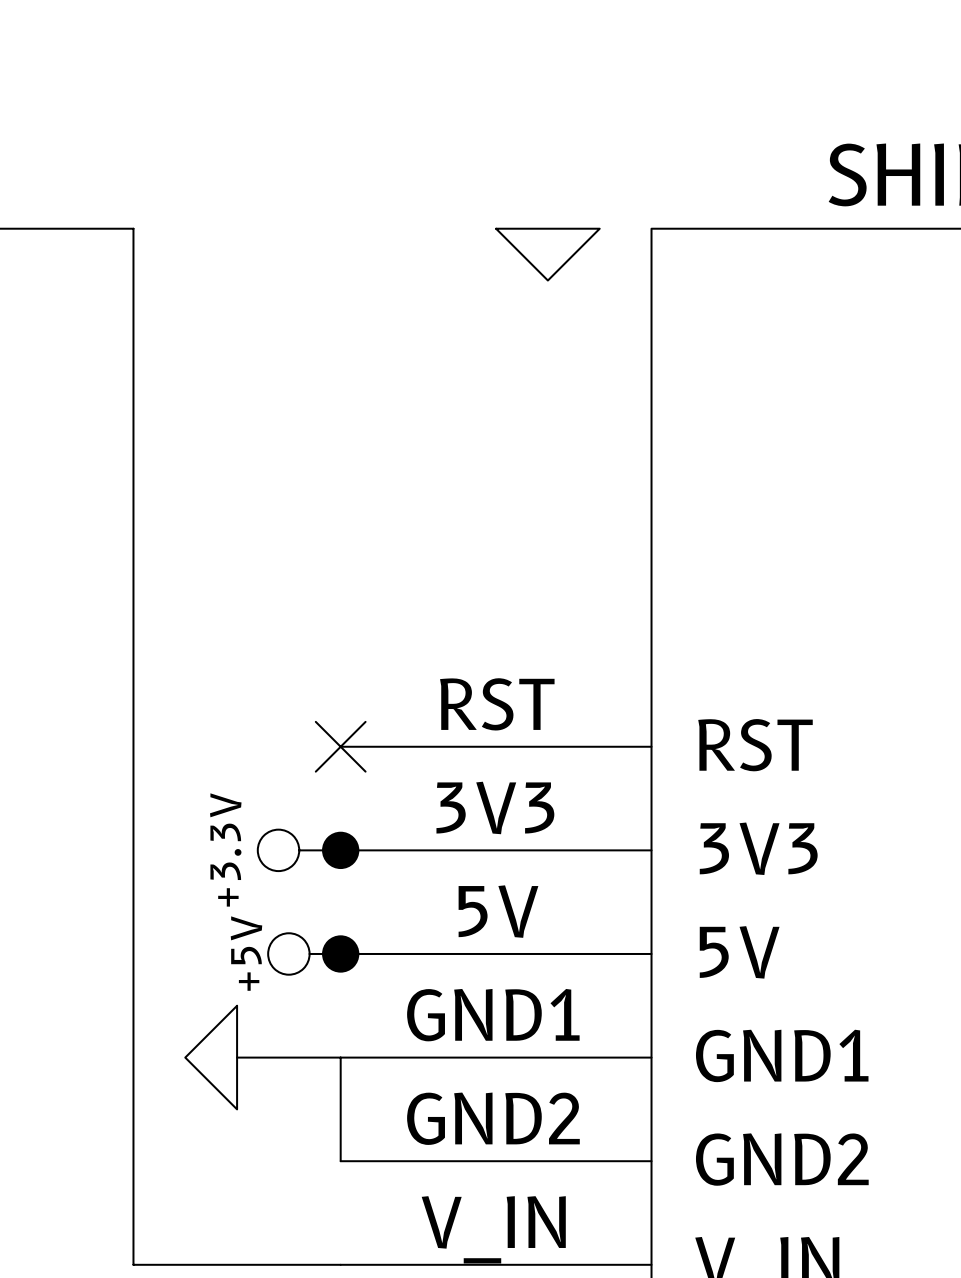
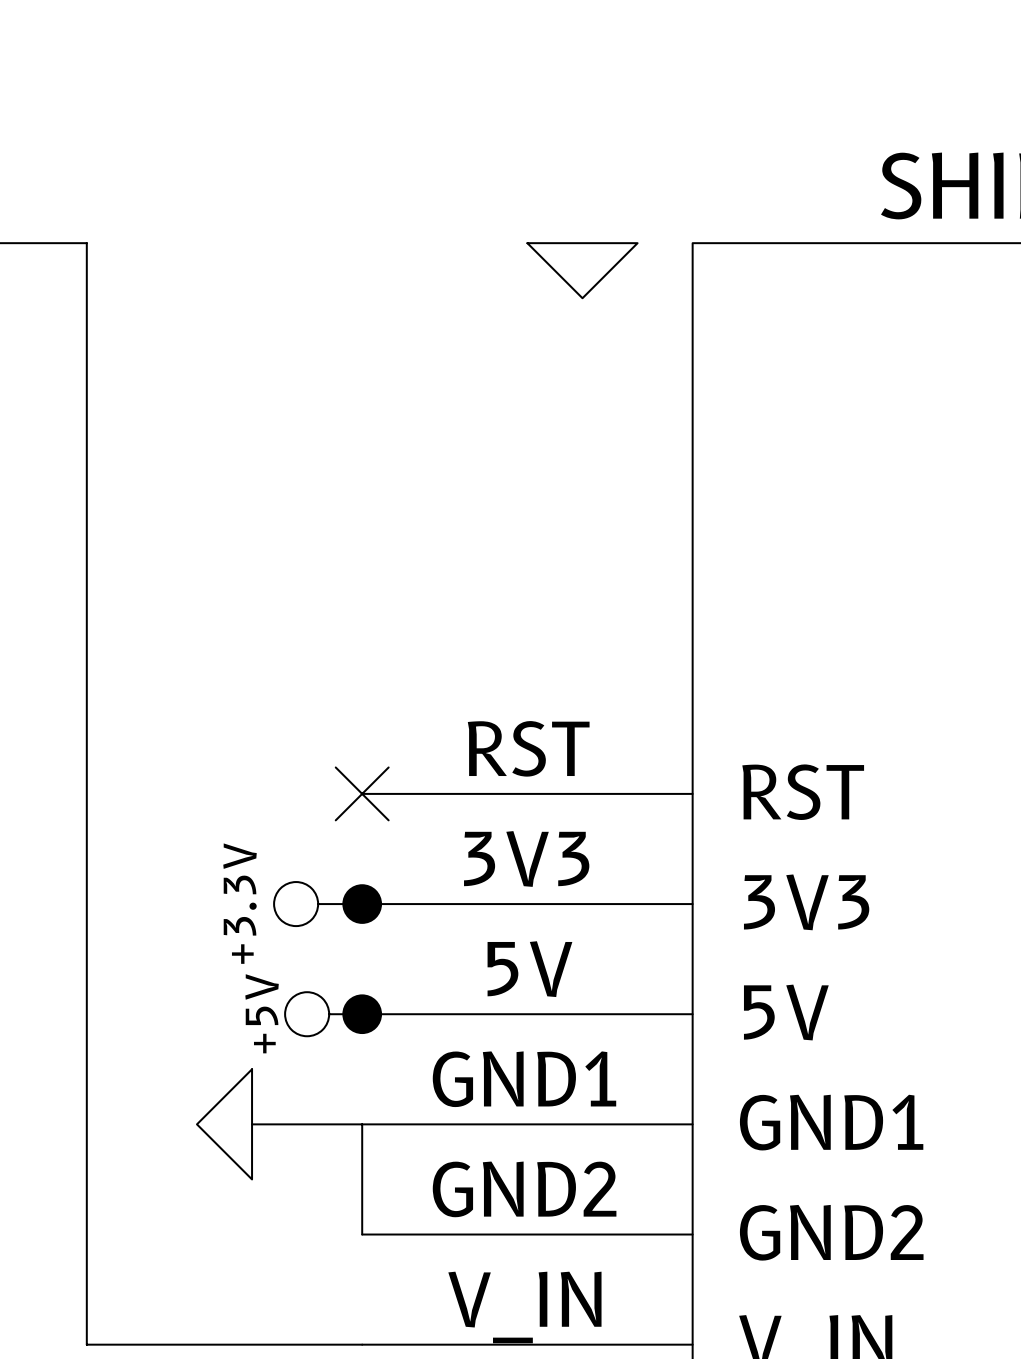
wire: (81, 228) (133, 228) (133, 1264) -> (86, 243) (86, 1344) (141, 1344)

